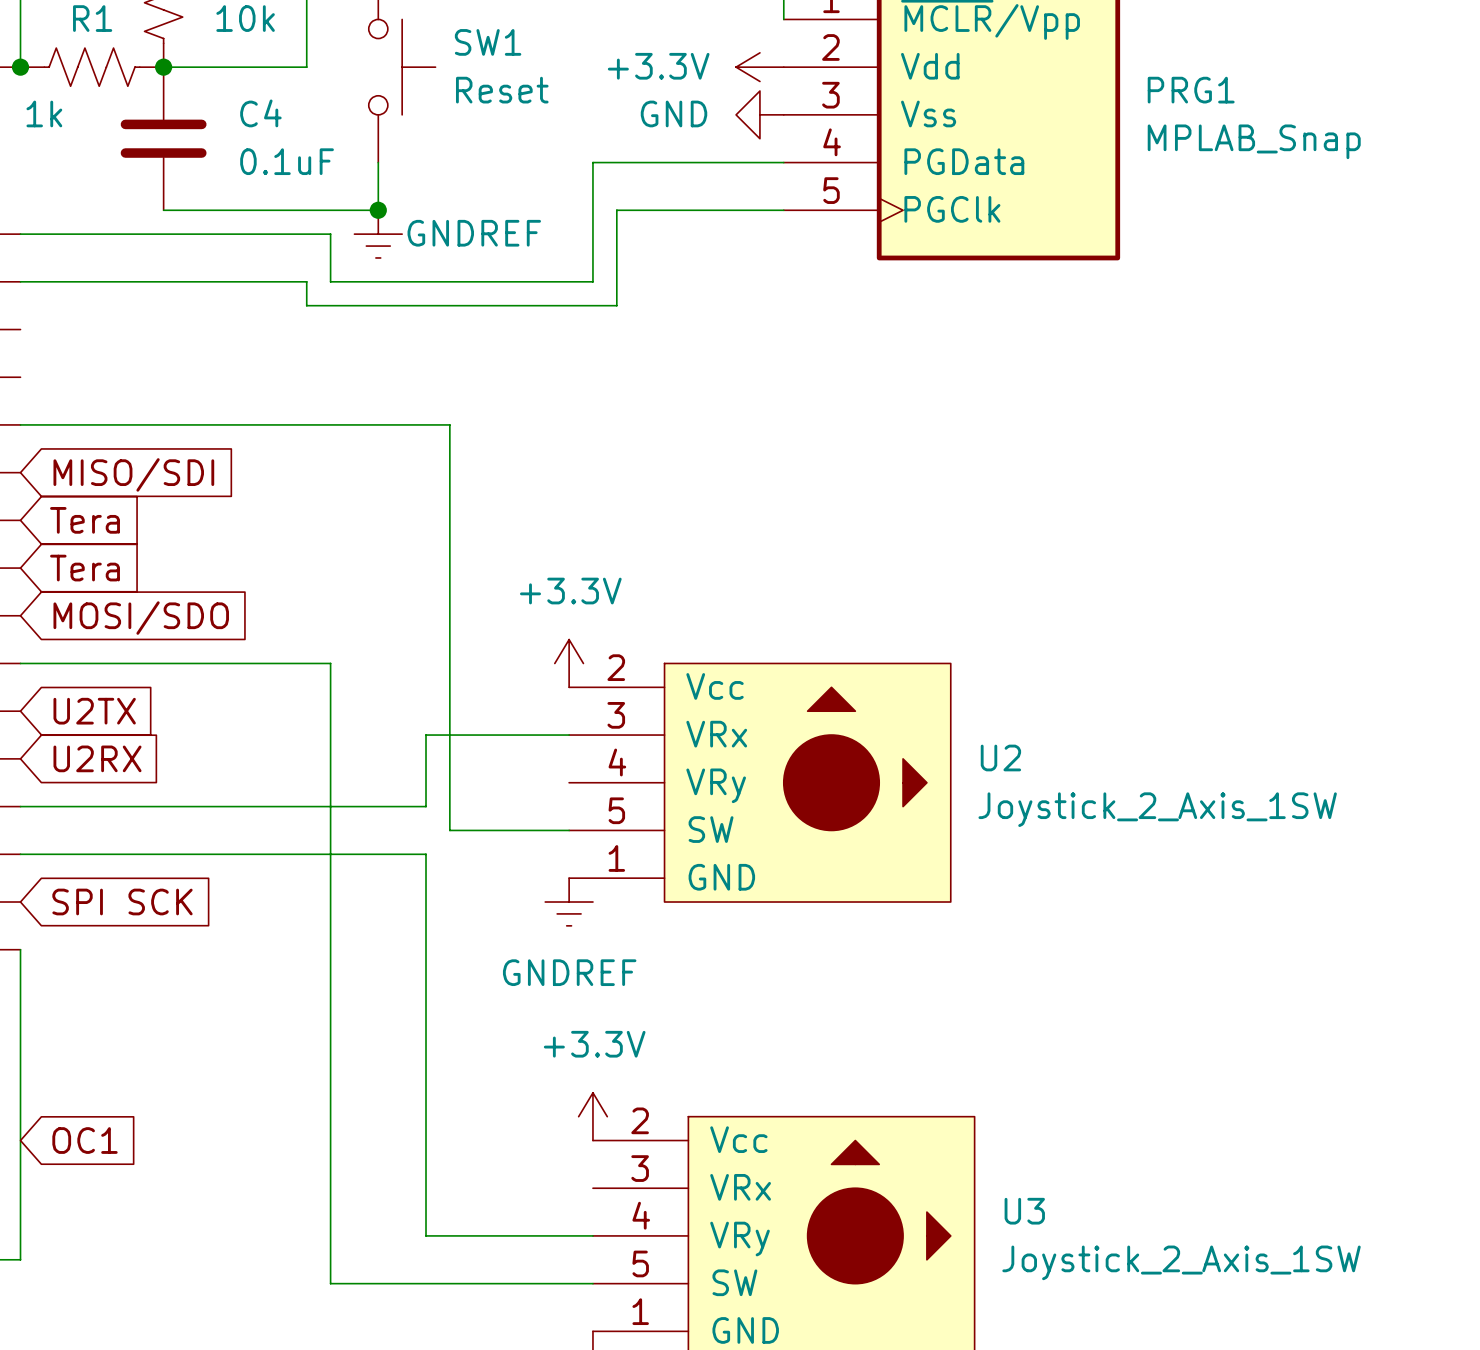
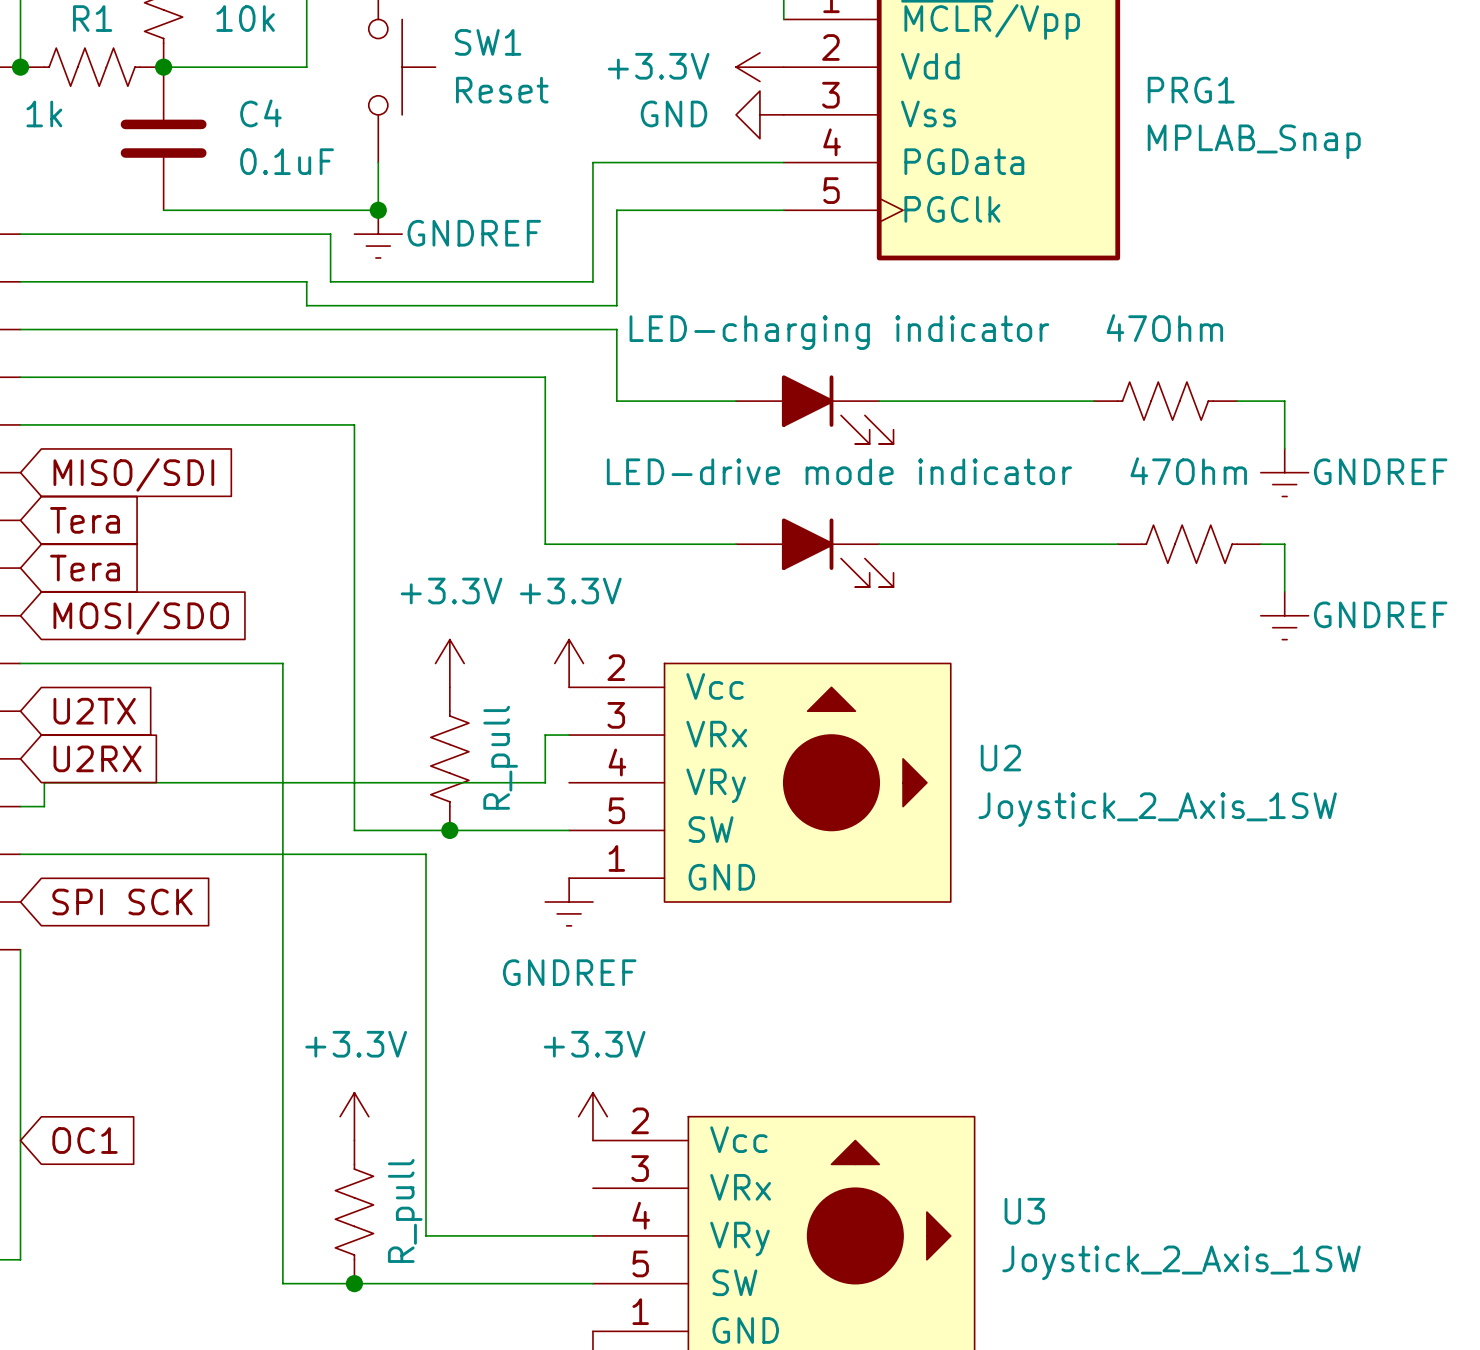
wire: none -> (20, 329) (616, 329) (616, 401) (736, 401)
wire: none -> (20, 377) (545, 377) (545, 544) (736, 544)
wire: none -> (879, 401) (1093, 401)
part: none -> 47Ohm (1165, 401)
wire: none -> (1236, 401) (1284, 401) (1284, 448)
part: none -> LED-charging indicator (814, 409)
wire: (354, 424) (449, 424) (449, 830) -> (354, 424) (354, 830) (449, 830)
power symbol: none -> GNDREF (1284, 472)
wire: none -> (879, 544) (1117, 544)
part: none -> 47Ohm (1189, 544)
wire: none -> (1260, 544) (1284, 544) (1284, 591)
part: none -> LED-drive mode indicator (814, 552)
power symbol: none -> GNDREF (1284, 615)
wire: (282, 663) (330, 663) (330, 1283) -> (282, 663) (282, 1283) (330, 1283)
power symbol: none -> +3.3V (449, 663)
wire: (545, 735) (426, 735) (426, 806) (44, 806) -> (545, 735) (545, 782) (44, 782) (44, 806)
part: none -> R_pull (449, 758)
junction: none -> (449, 830)
power symbol: none -> +3.3V (354, 1116)
part: none -> R_pull (354, 1212)
junction: none -> (354, 1283)

